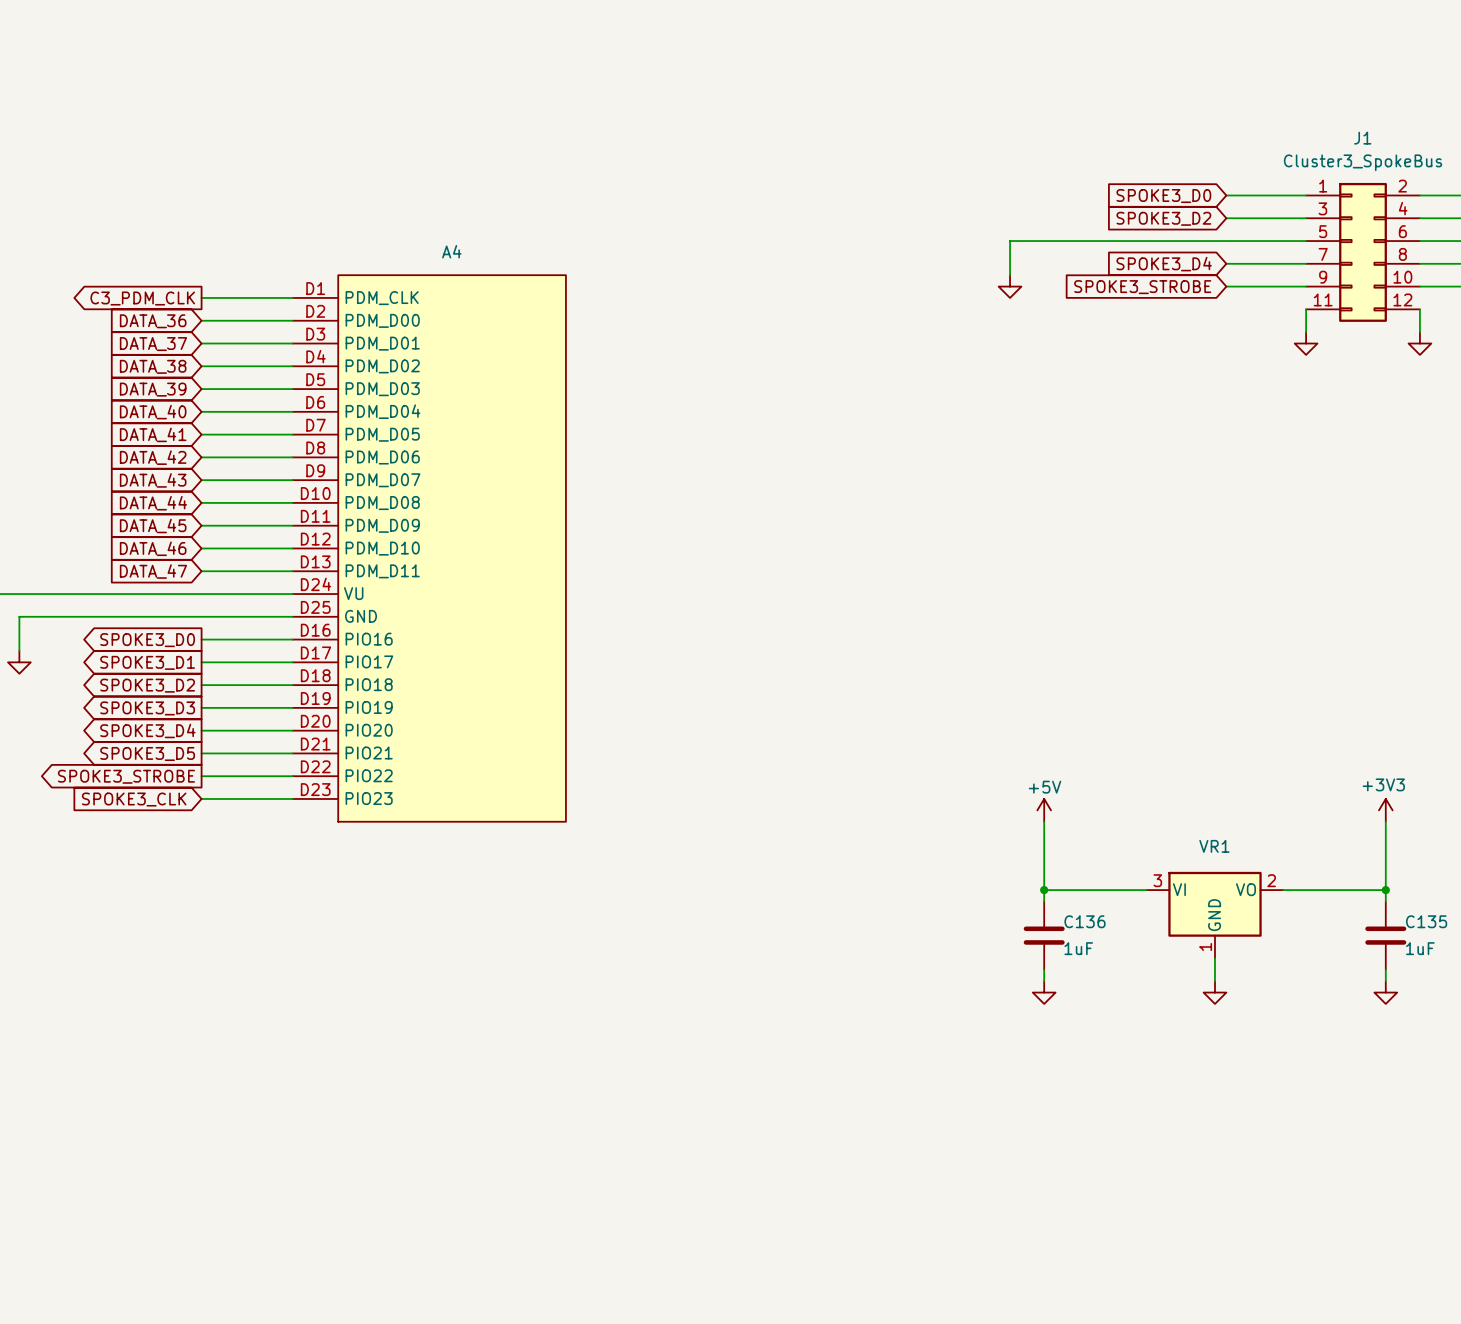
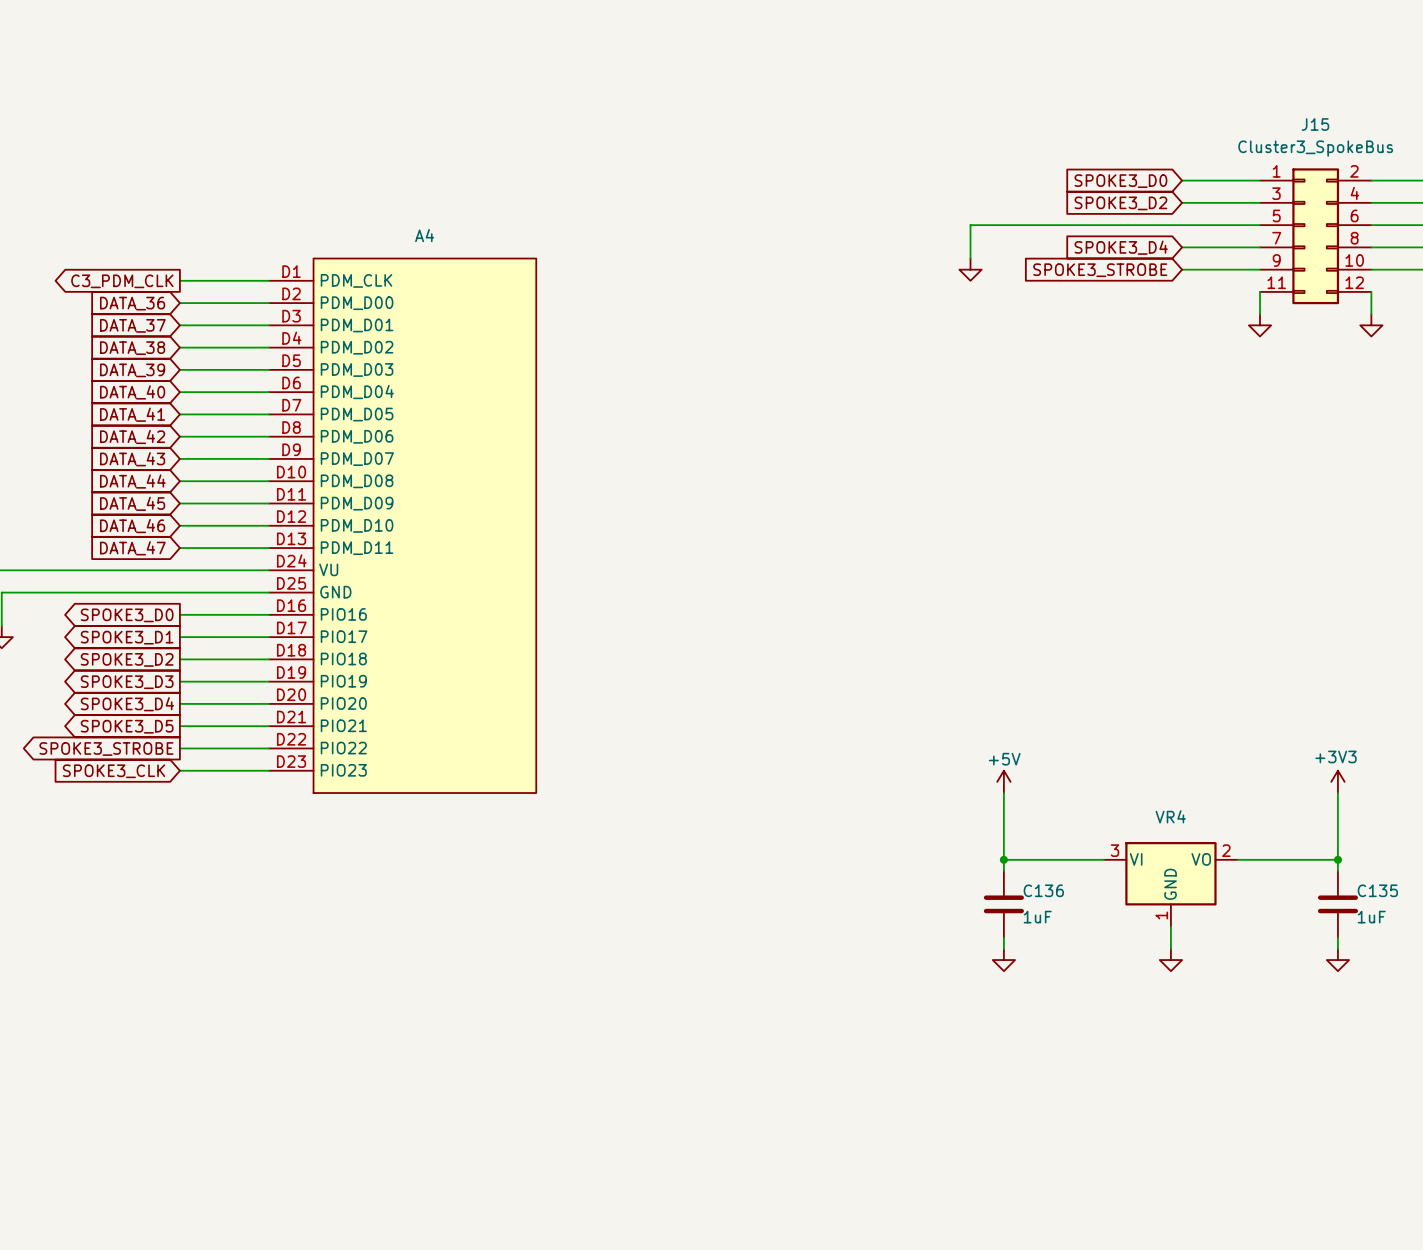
J1 name: J1 (1362, 138) -> J15 (1315, 124)
VR1 name: VR1 (1214, 846) -> VR4 (1170, 816)

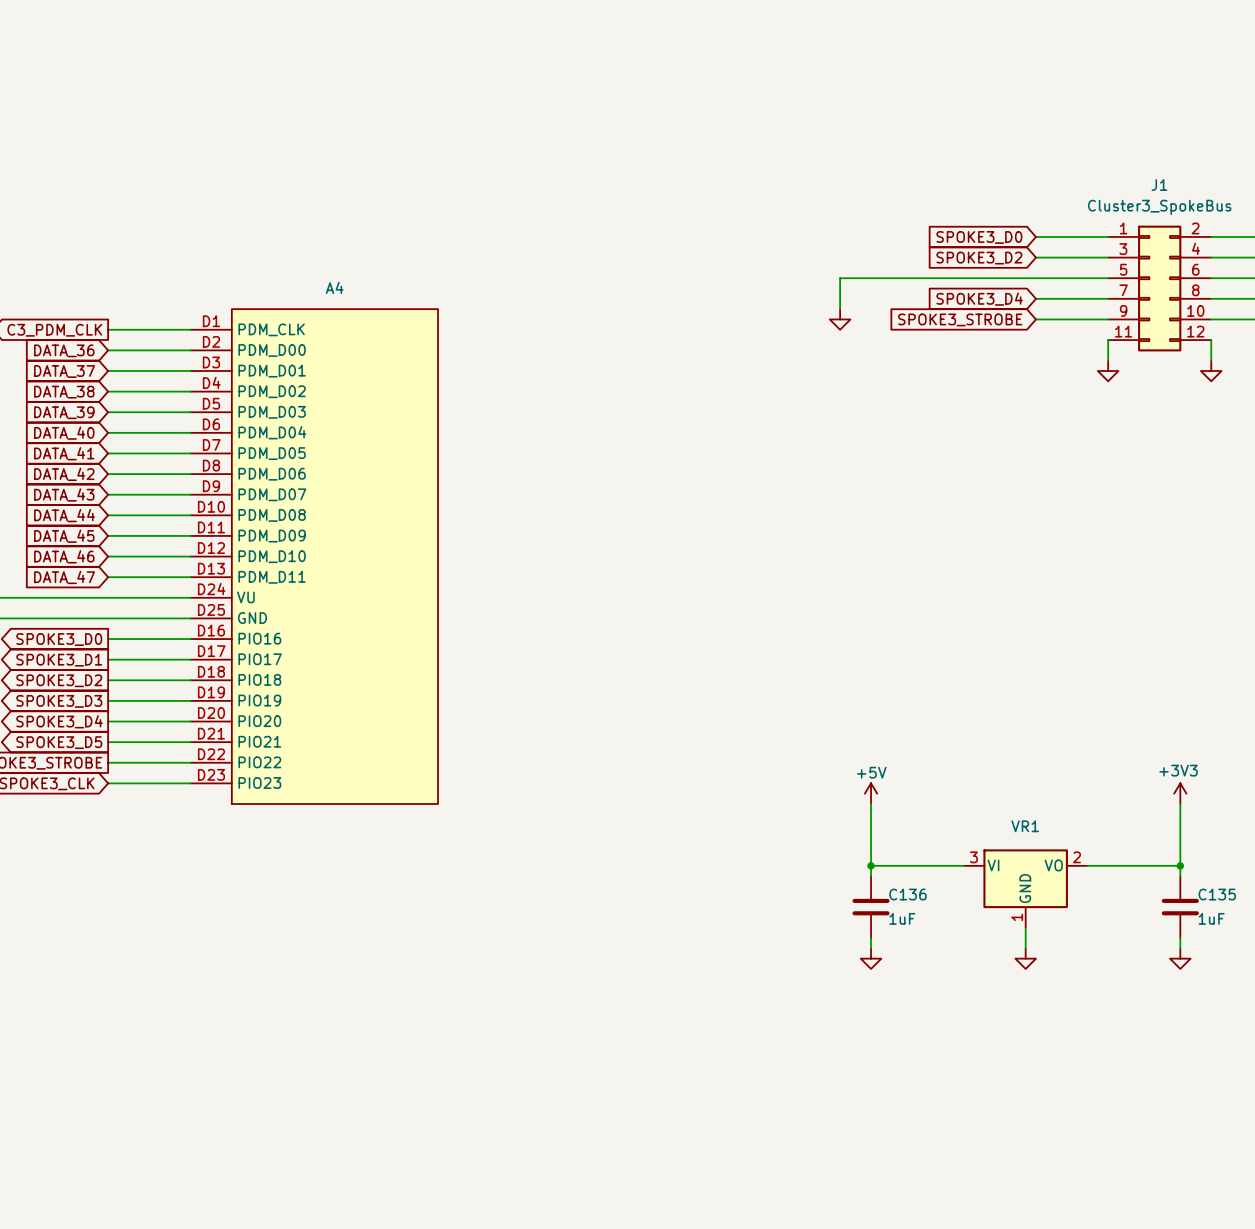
J15 name: J15 (1315, 124) -> J1 (1159, 185)
VR4 name: VR4 (1170, 816) -> VR1 (1025, 826)

